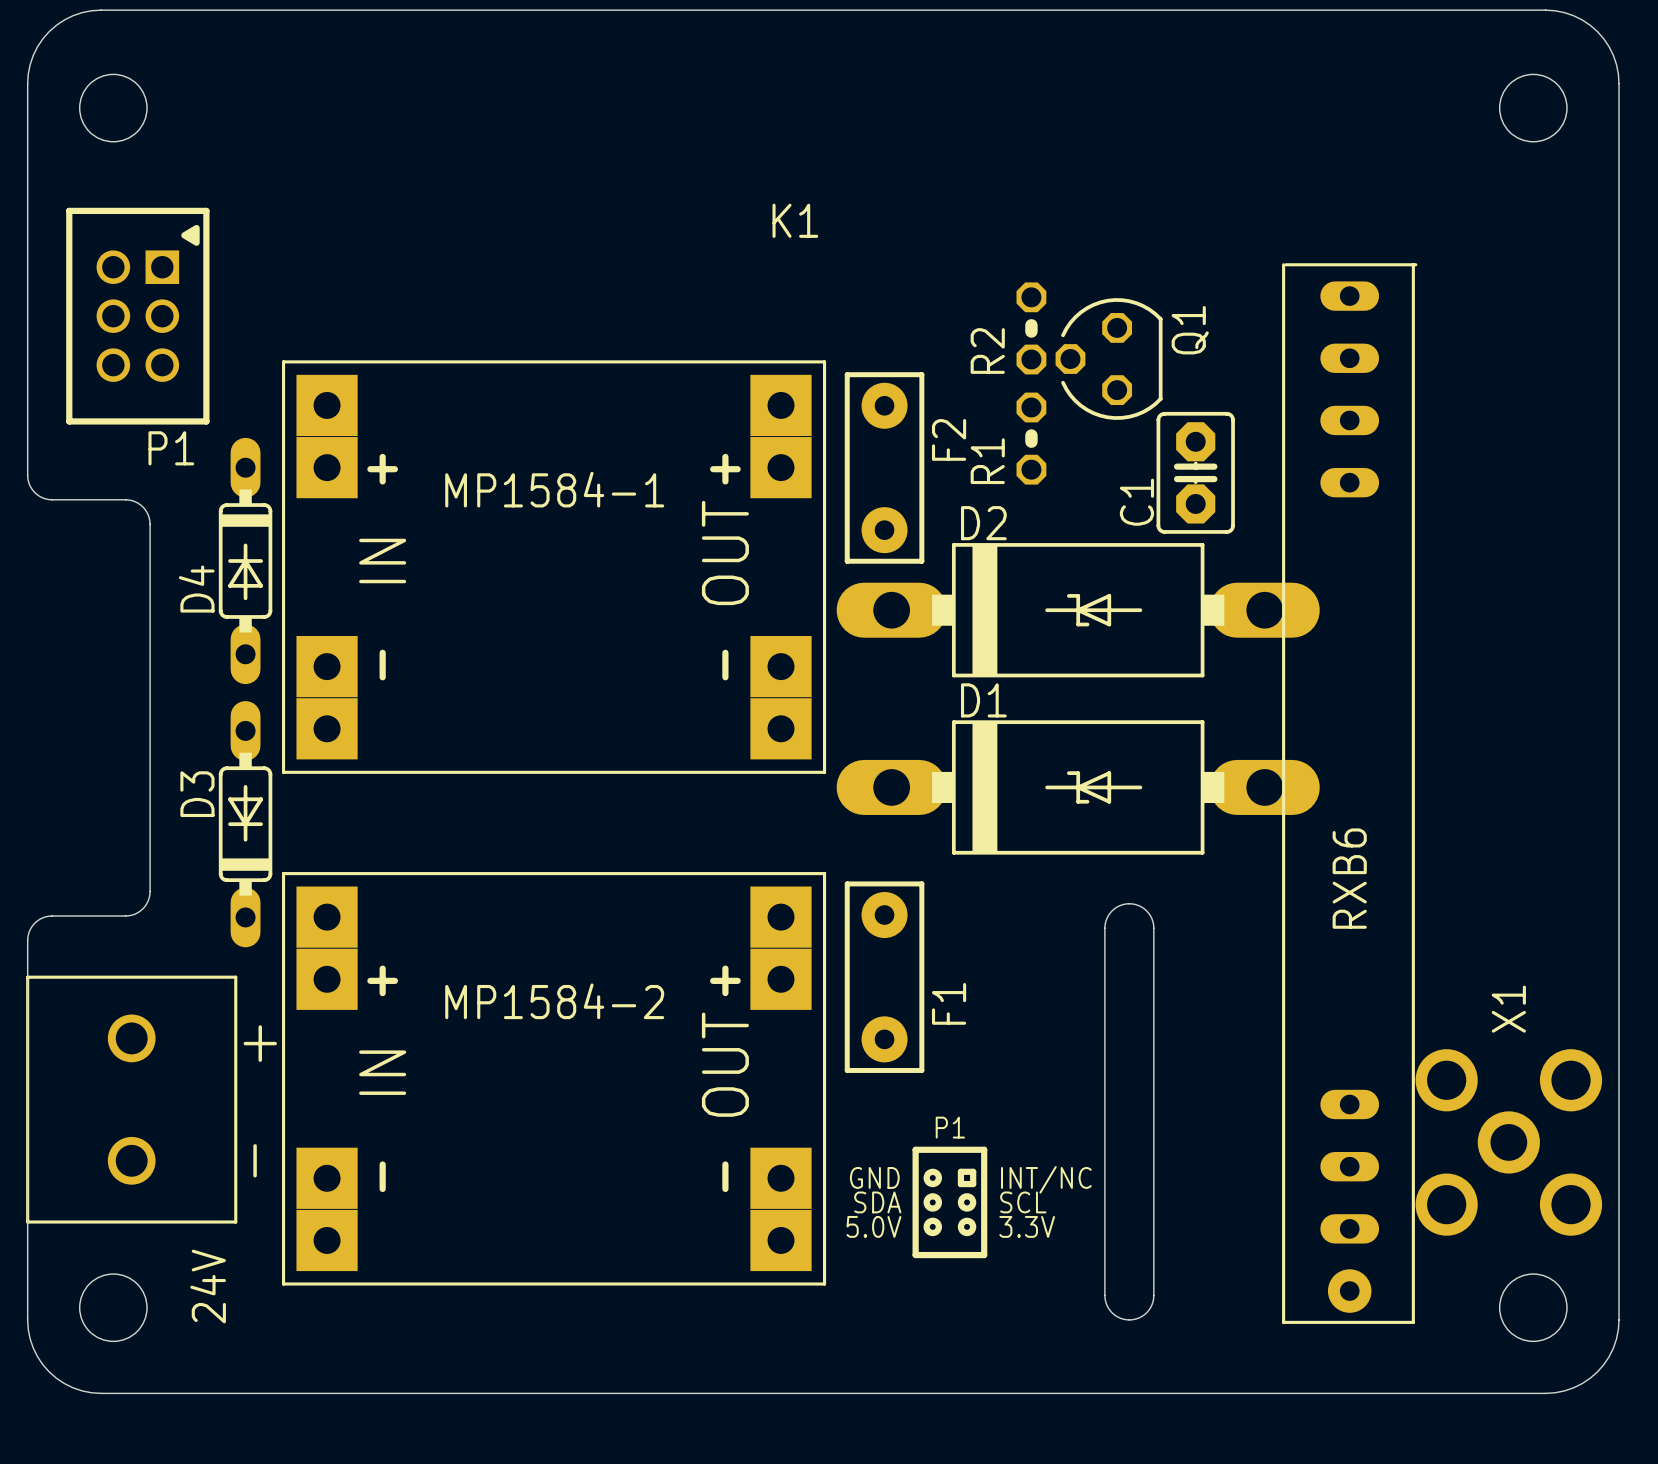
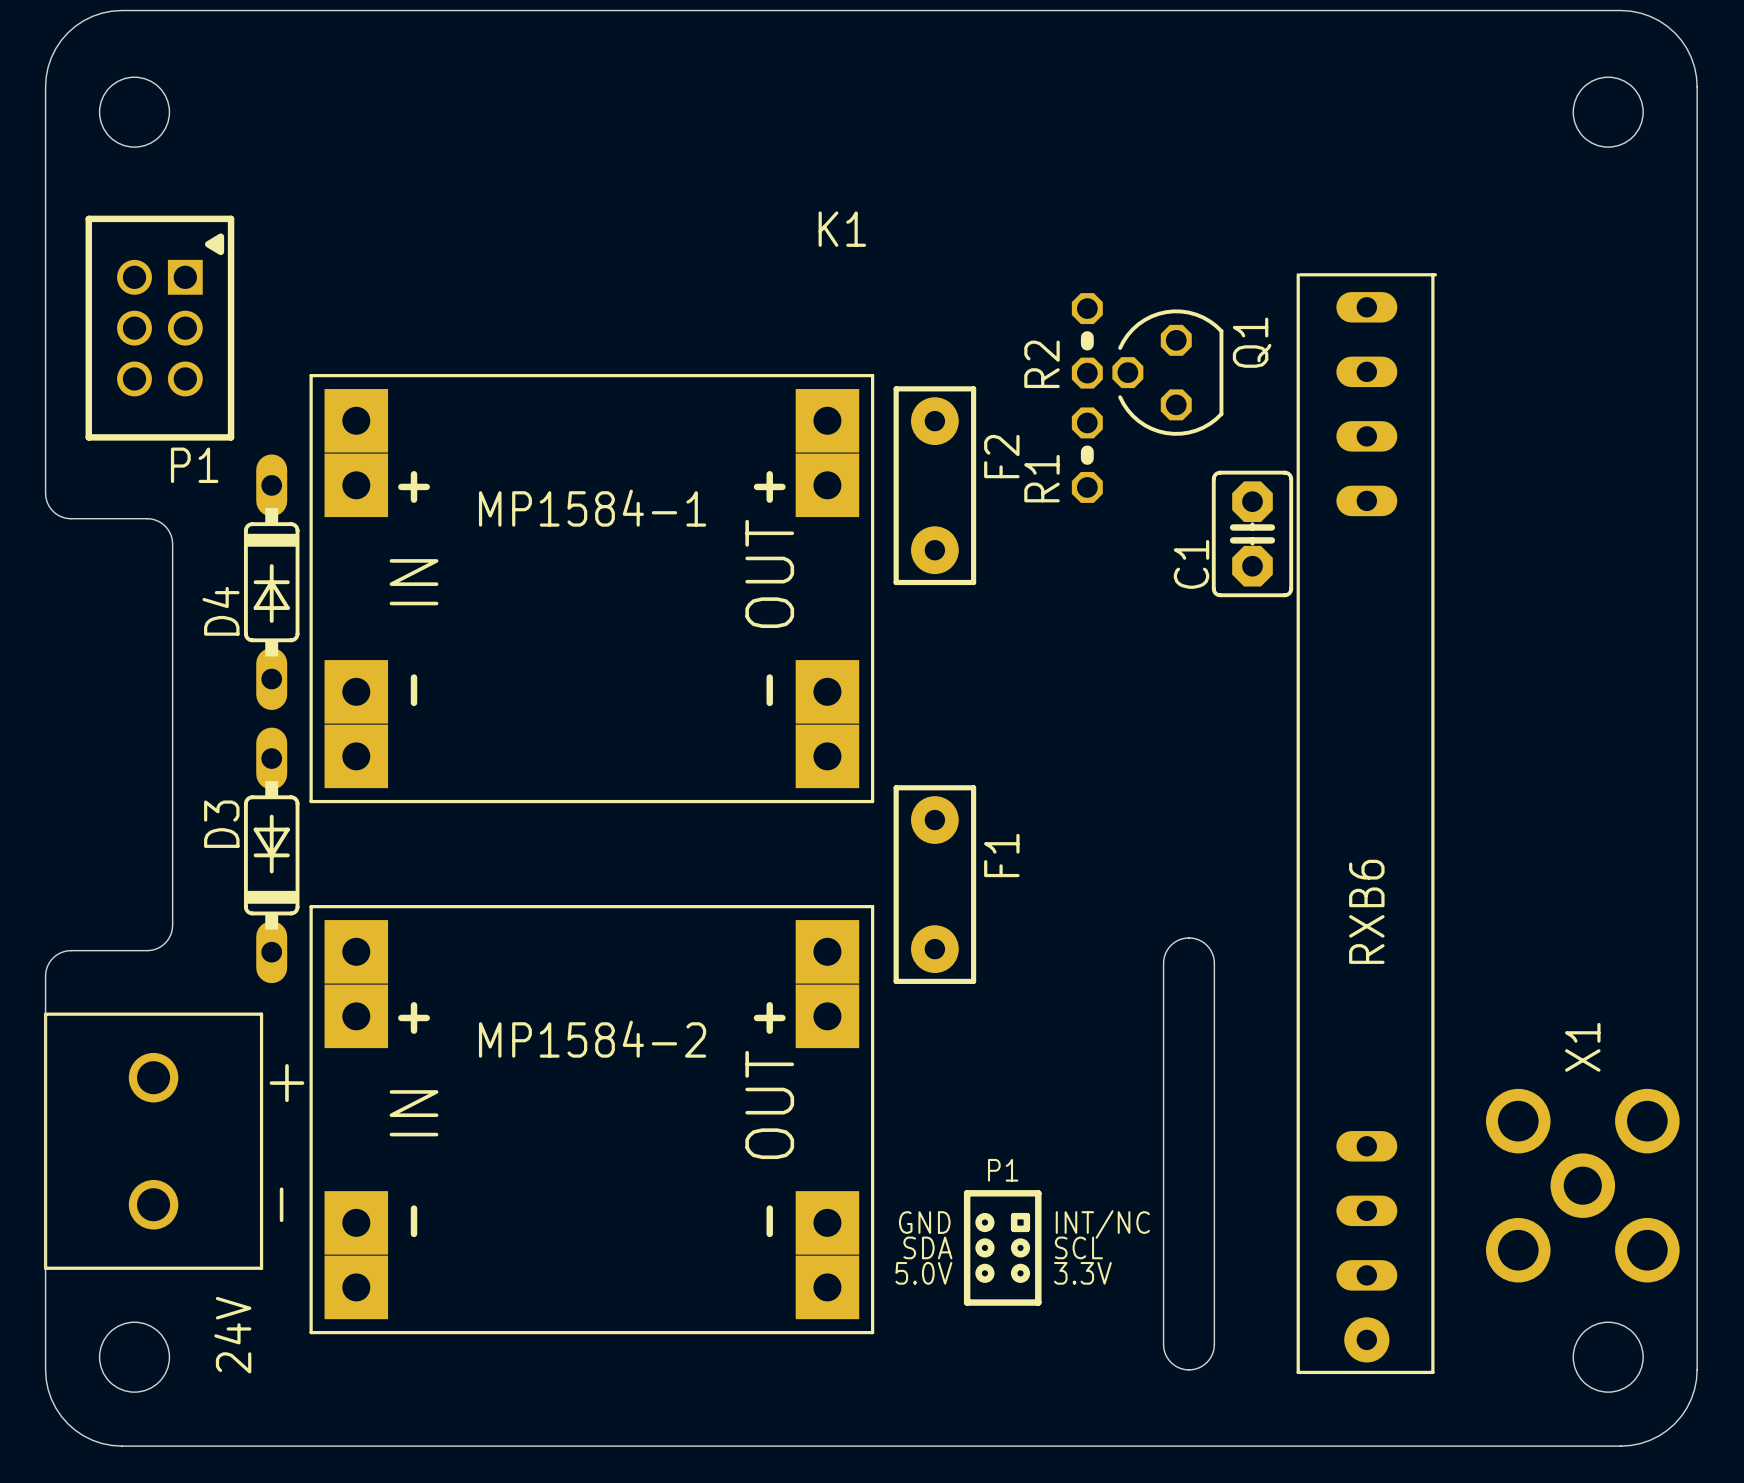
C1 position: (1195, 472) -> (1252, 533)
D2: (1078, 610) -> none
D1: (1078, 787) -> none
RXB6 position: (1349, 793) -> (1366, 823)
F1 position: (884, 977) -> (934, 884)
F1 name position: F1 (949, 1003) -> F1 (1001, 855)

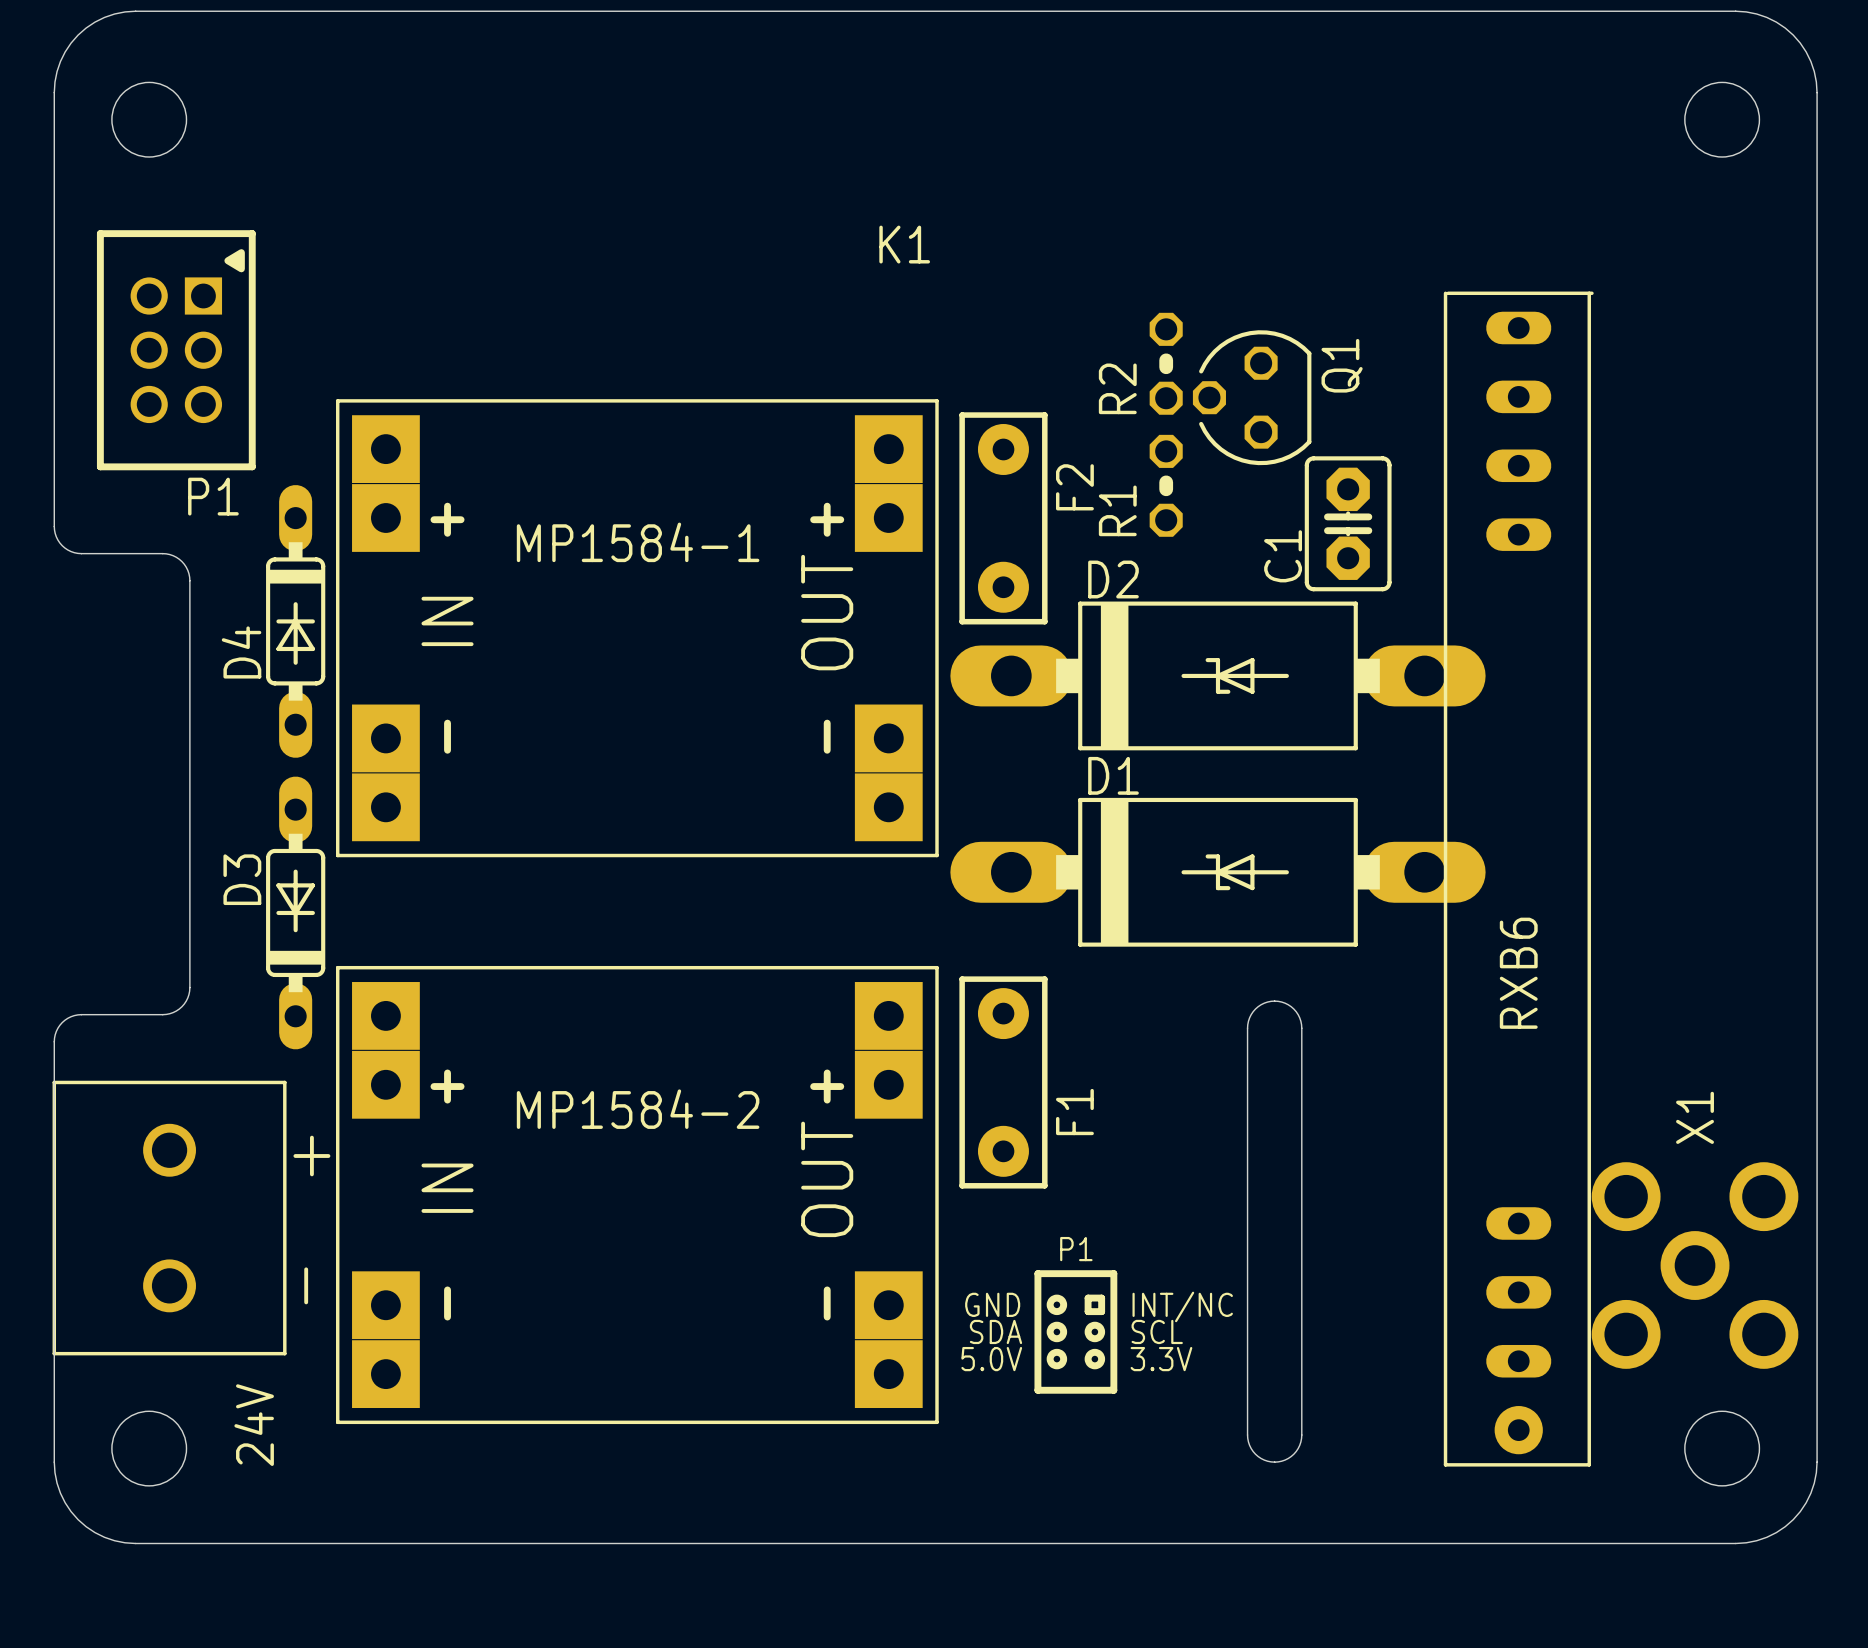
C1 position: (1252, 533) -> (1348, 523)
D2: none -> (1217, 675)
D1: none -> (1217, 872)
RXB6 position: (1366, 823) -> (1518, 879)
F1 name position: F1 (1001, 855) -> F1 (1074, 1112)
F1 position: (934, 884) -> (1003, 1082)

